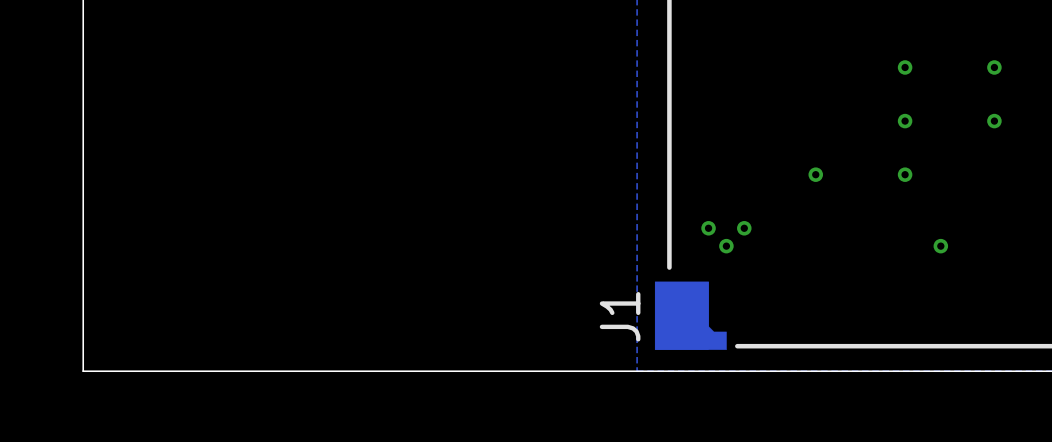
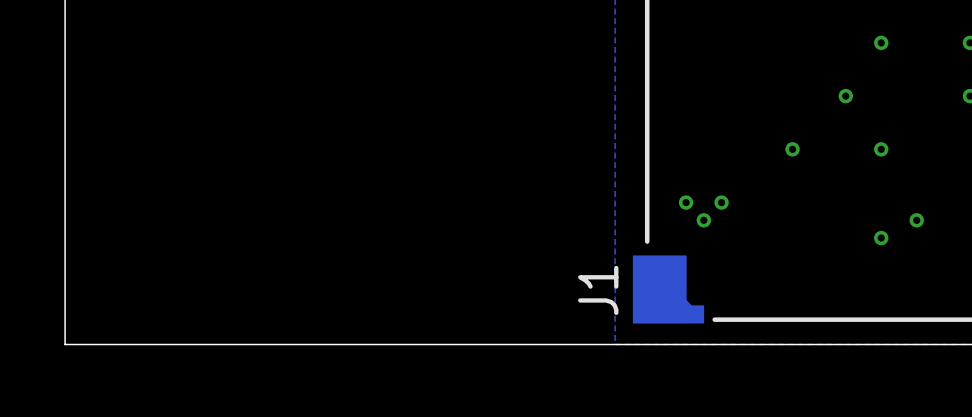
via position: (905, 121) -> (845, 96)
via: none -> (881, 238)

